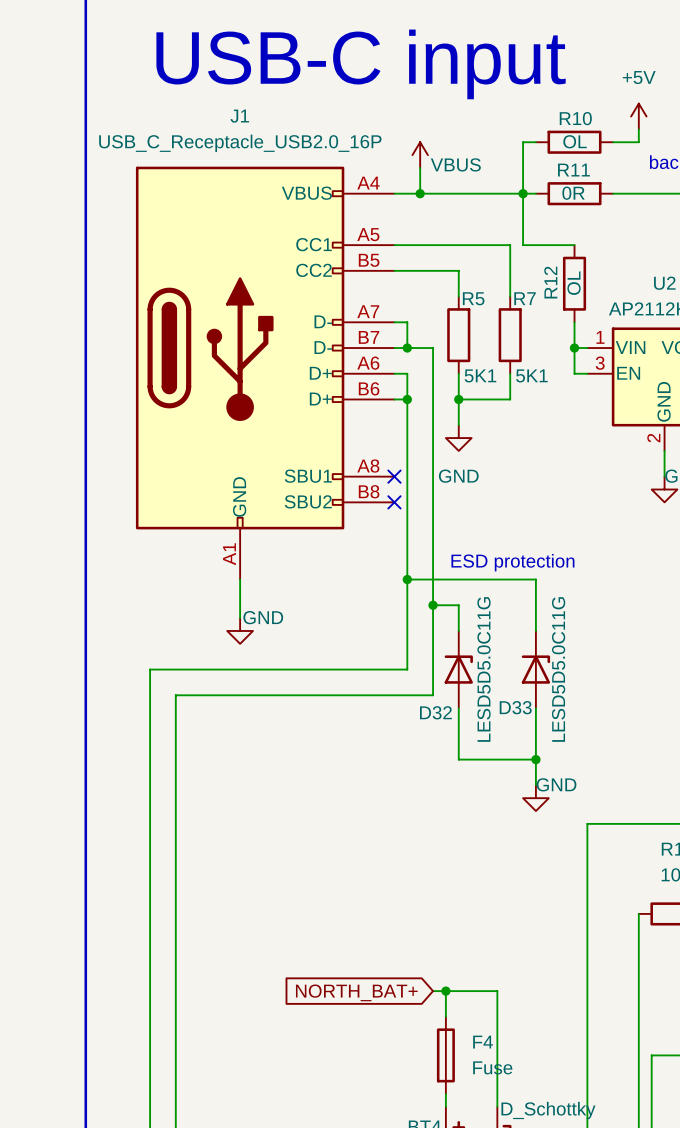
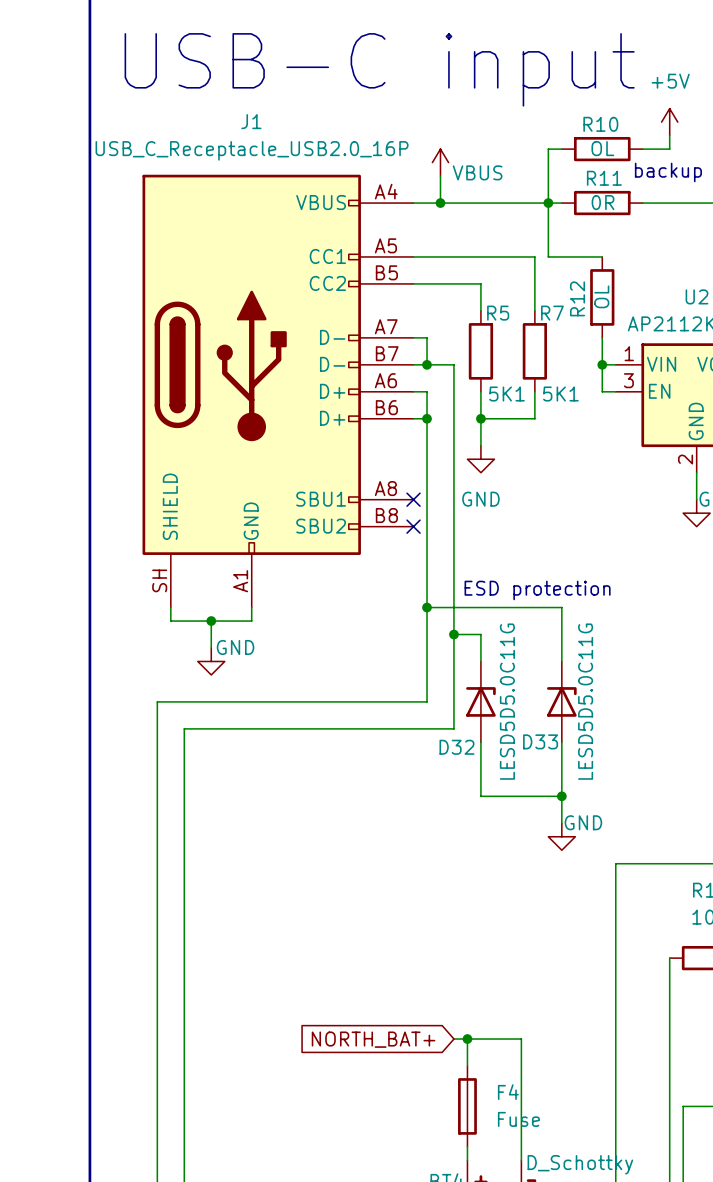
J1 symbol: [135, 166, 395, 580] -> [142, 174, 414, 608]
wire: none -> (211, 621) (211, 648)
junction: none -> (211, 621)
wire: (240, 592) (240, 618) -> (251, 621) (170, 621) (170, 607)
power symbol position: GND (240, 630) -> GND (211, 661)

